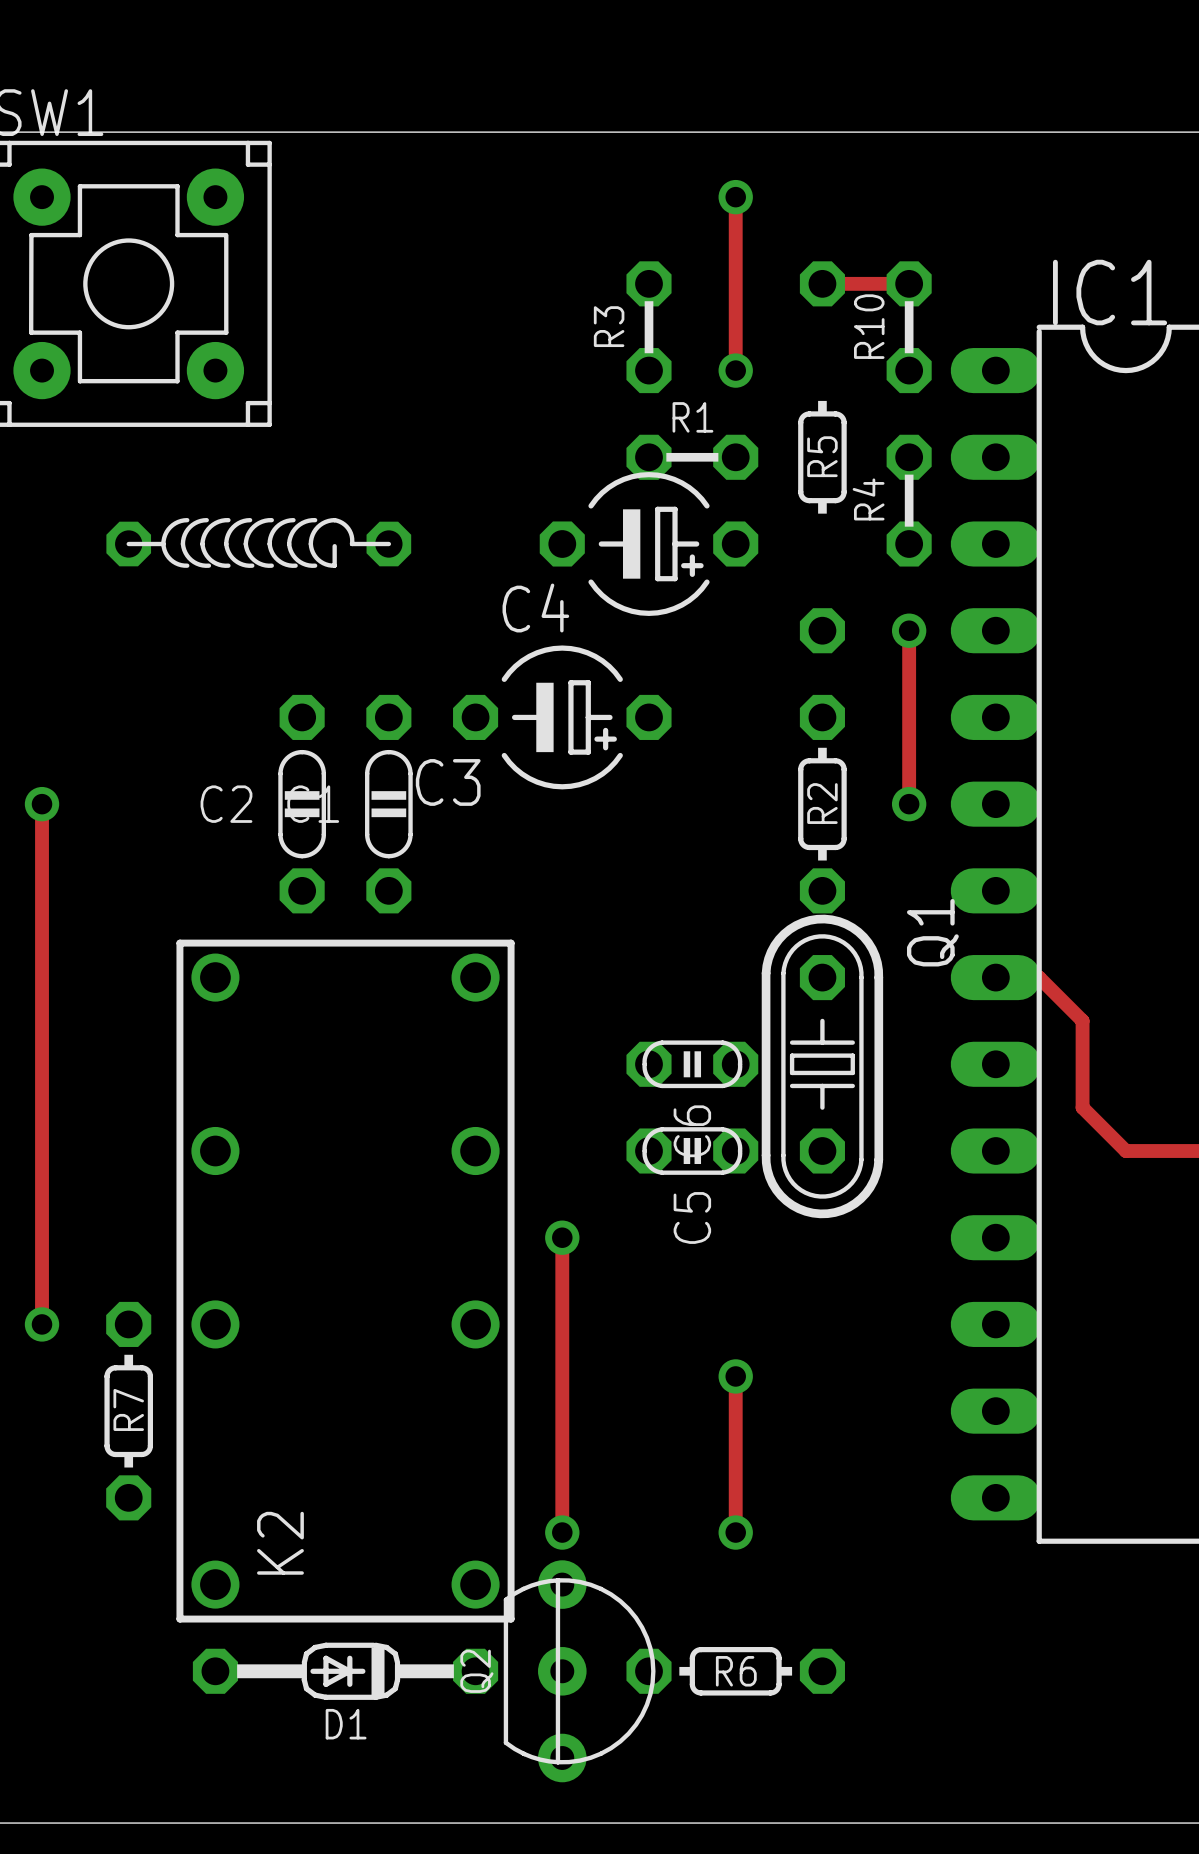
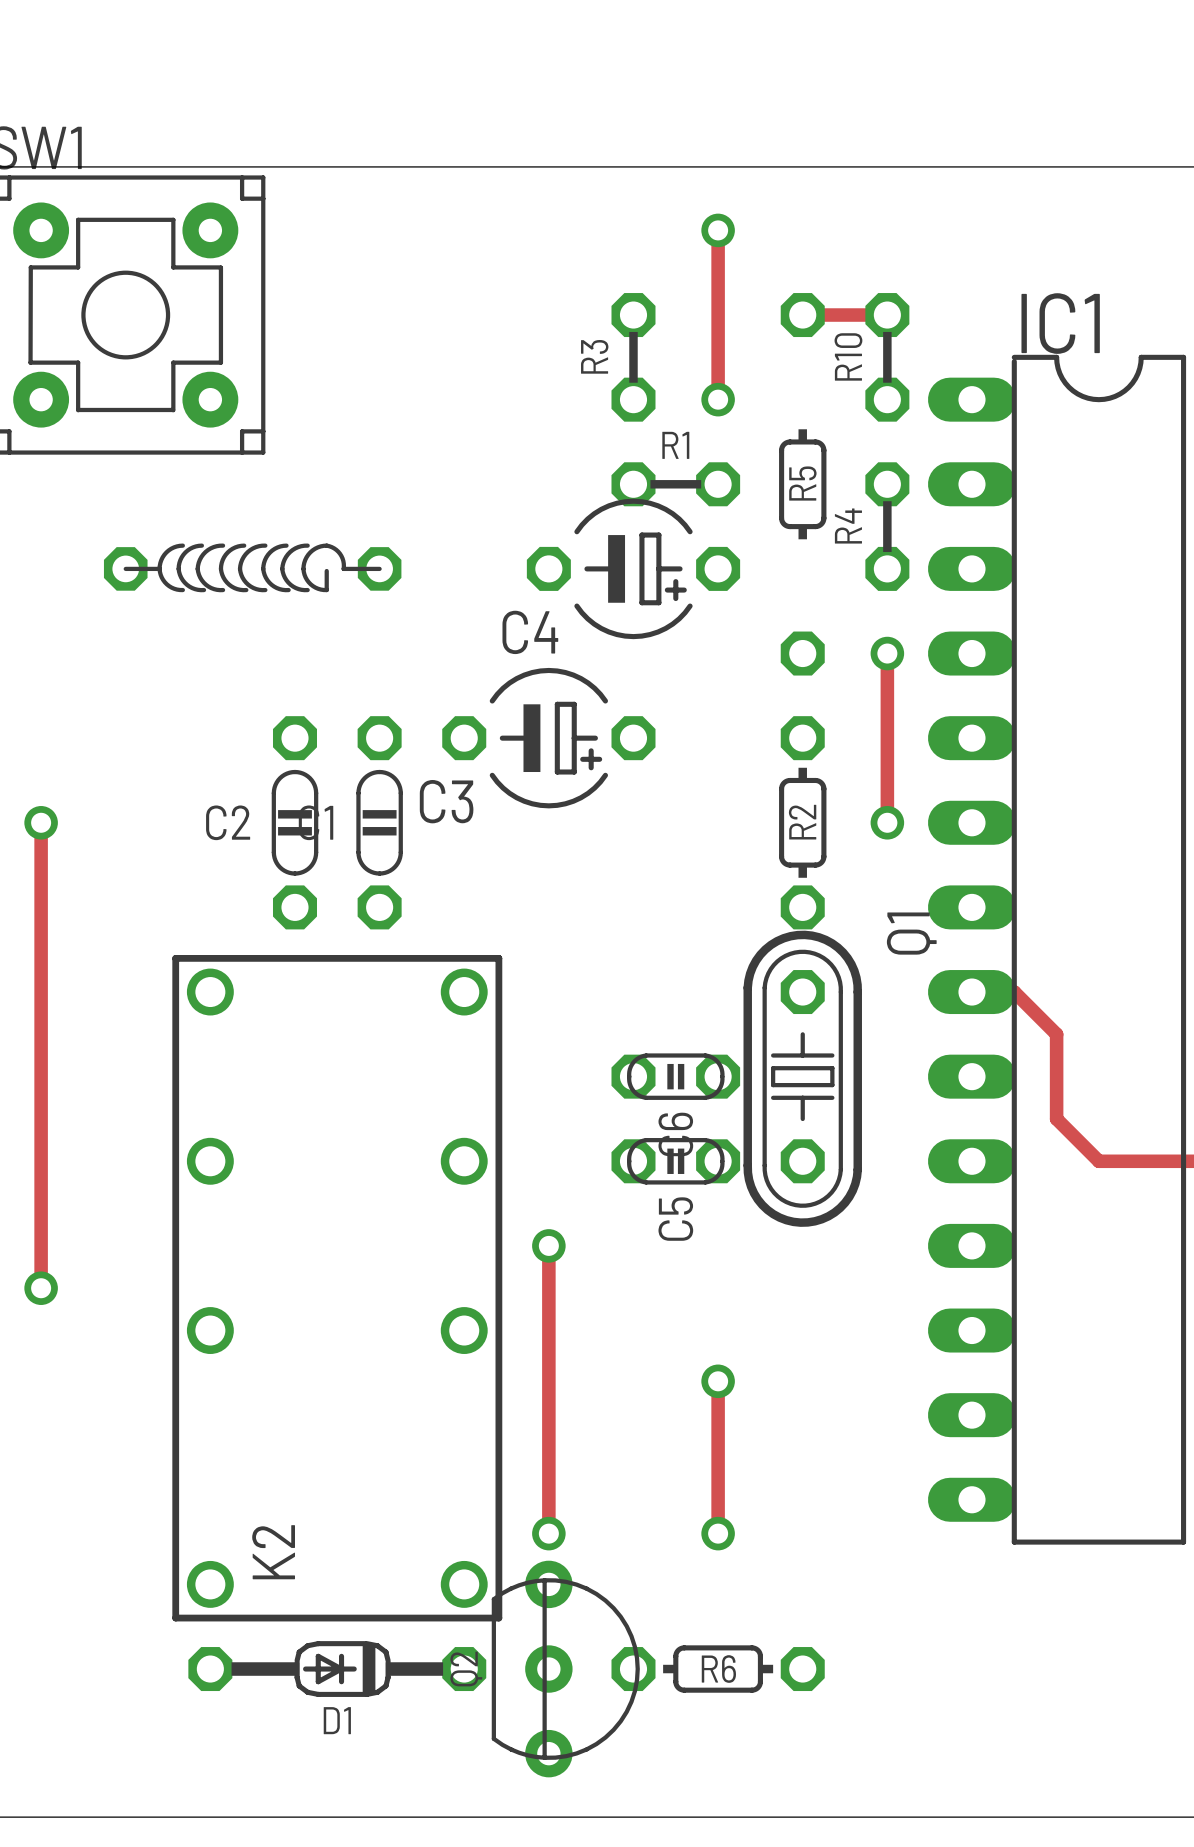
track: (42, 1281) (42, 1324) -> none
via position: (42, 1324) -> (41, 1288)
R7: (128, 1411) -> none

